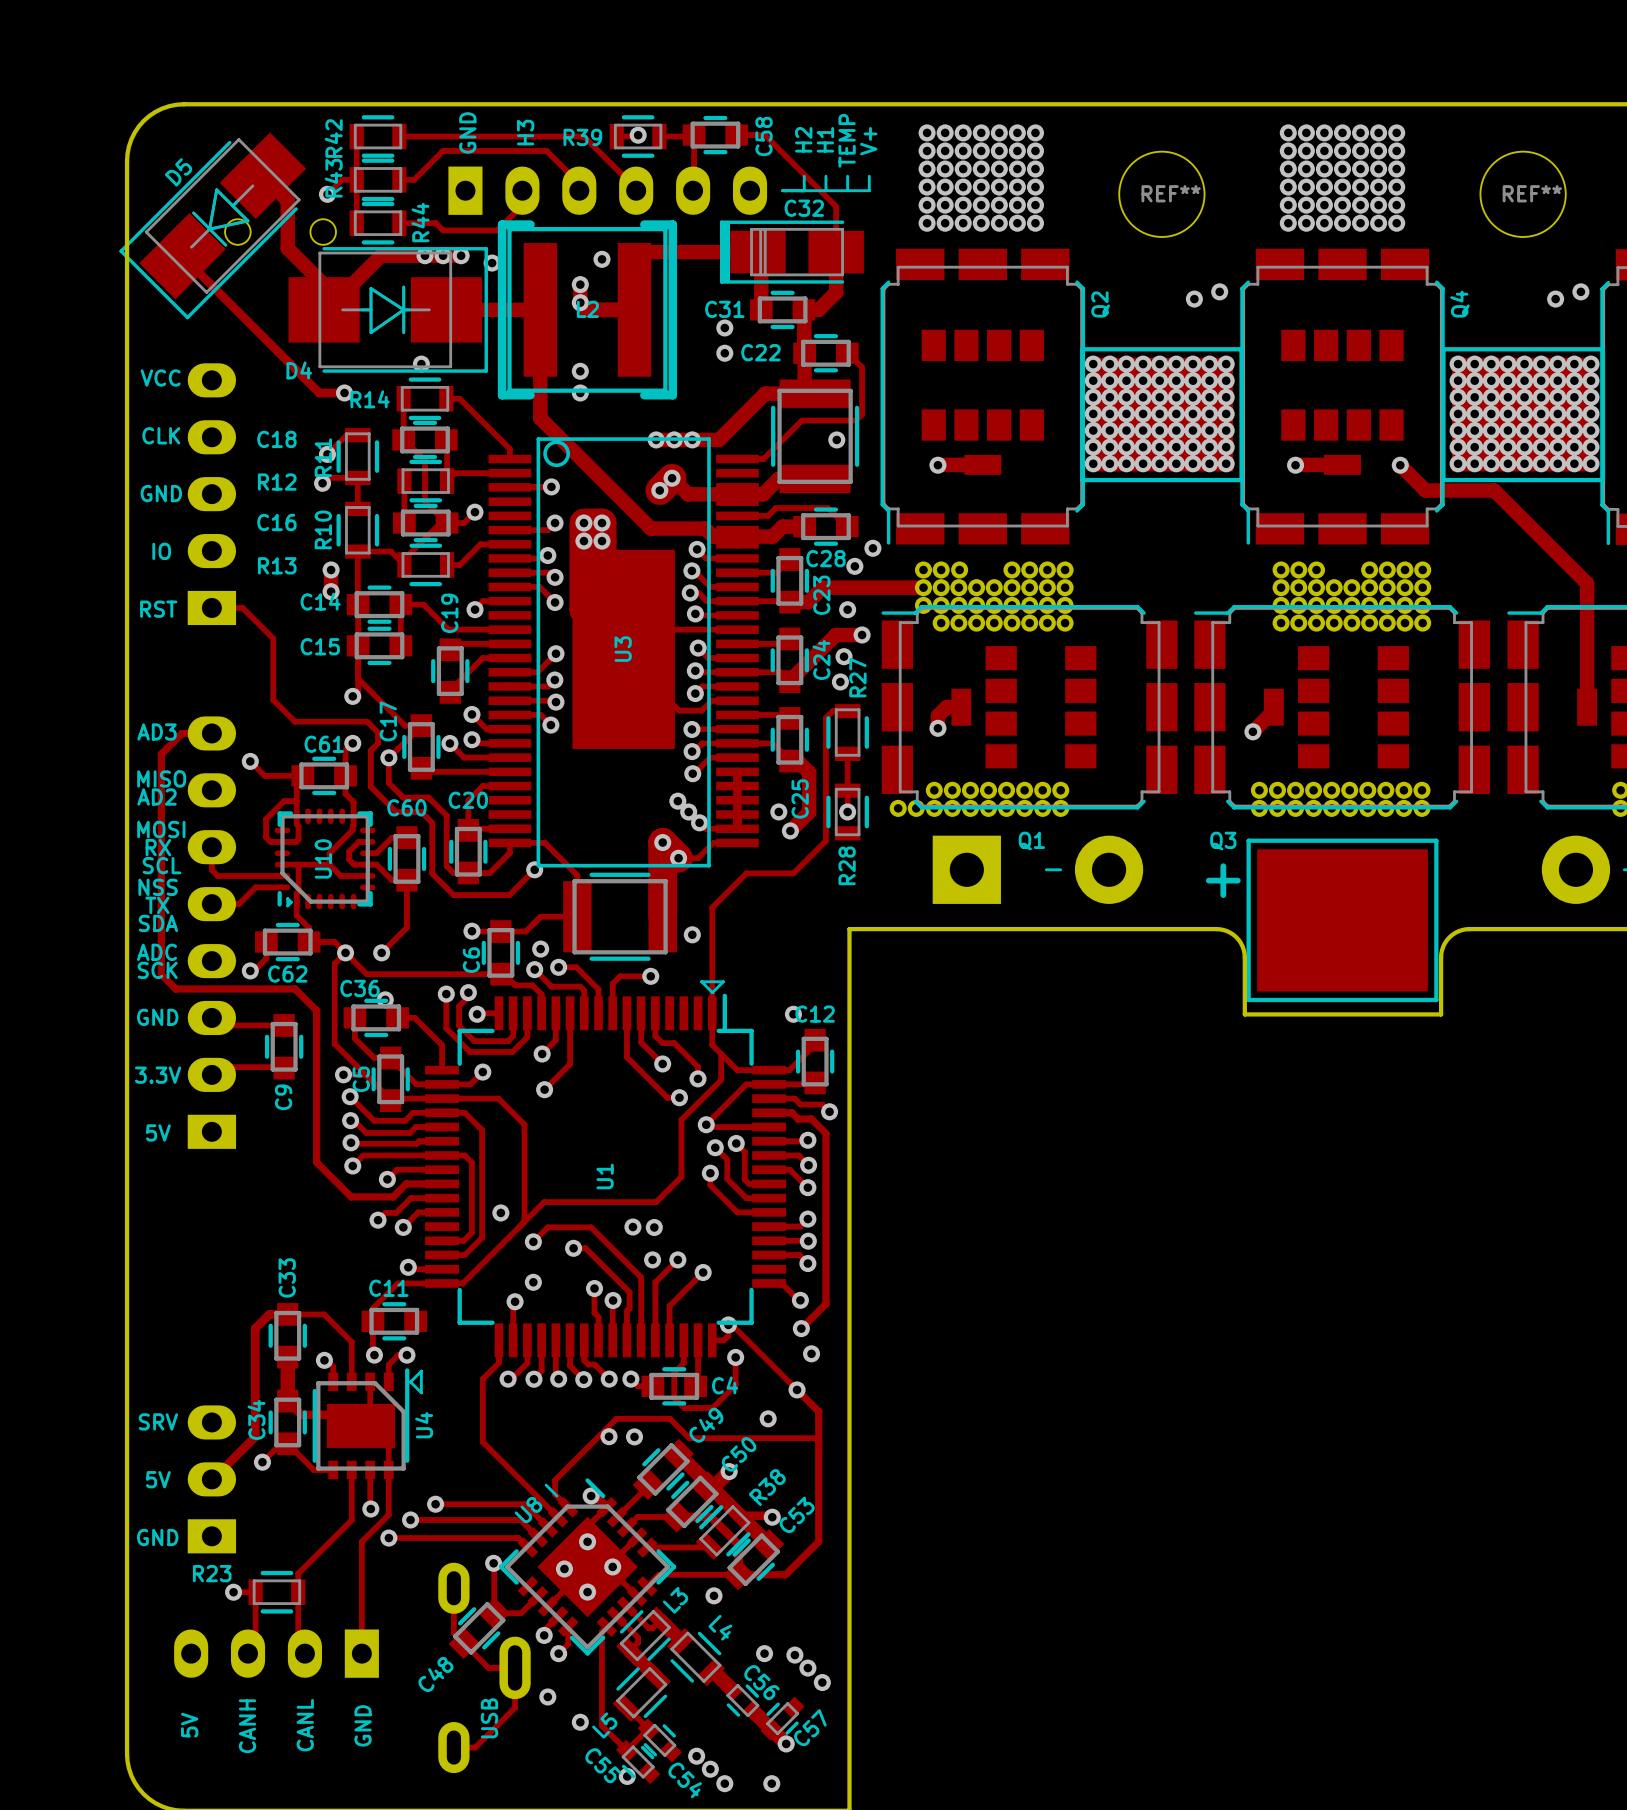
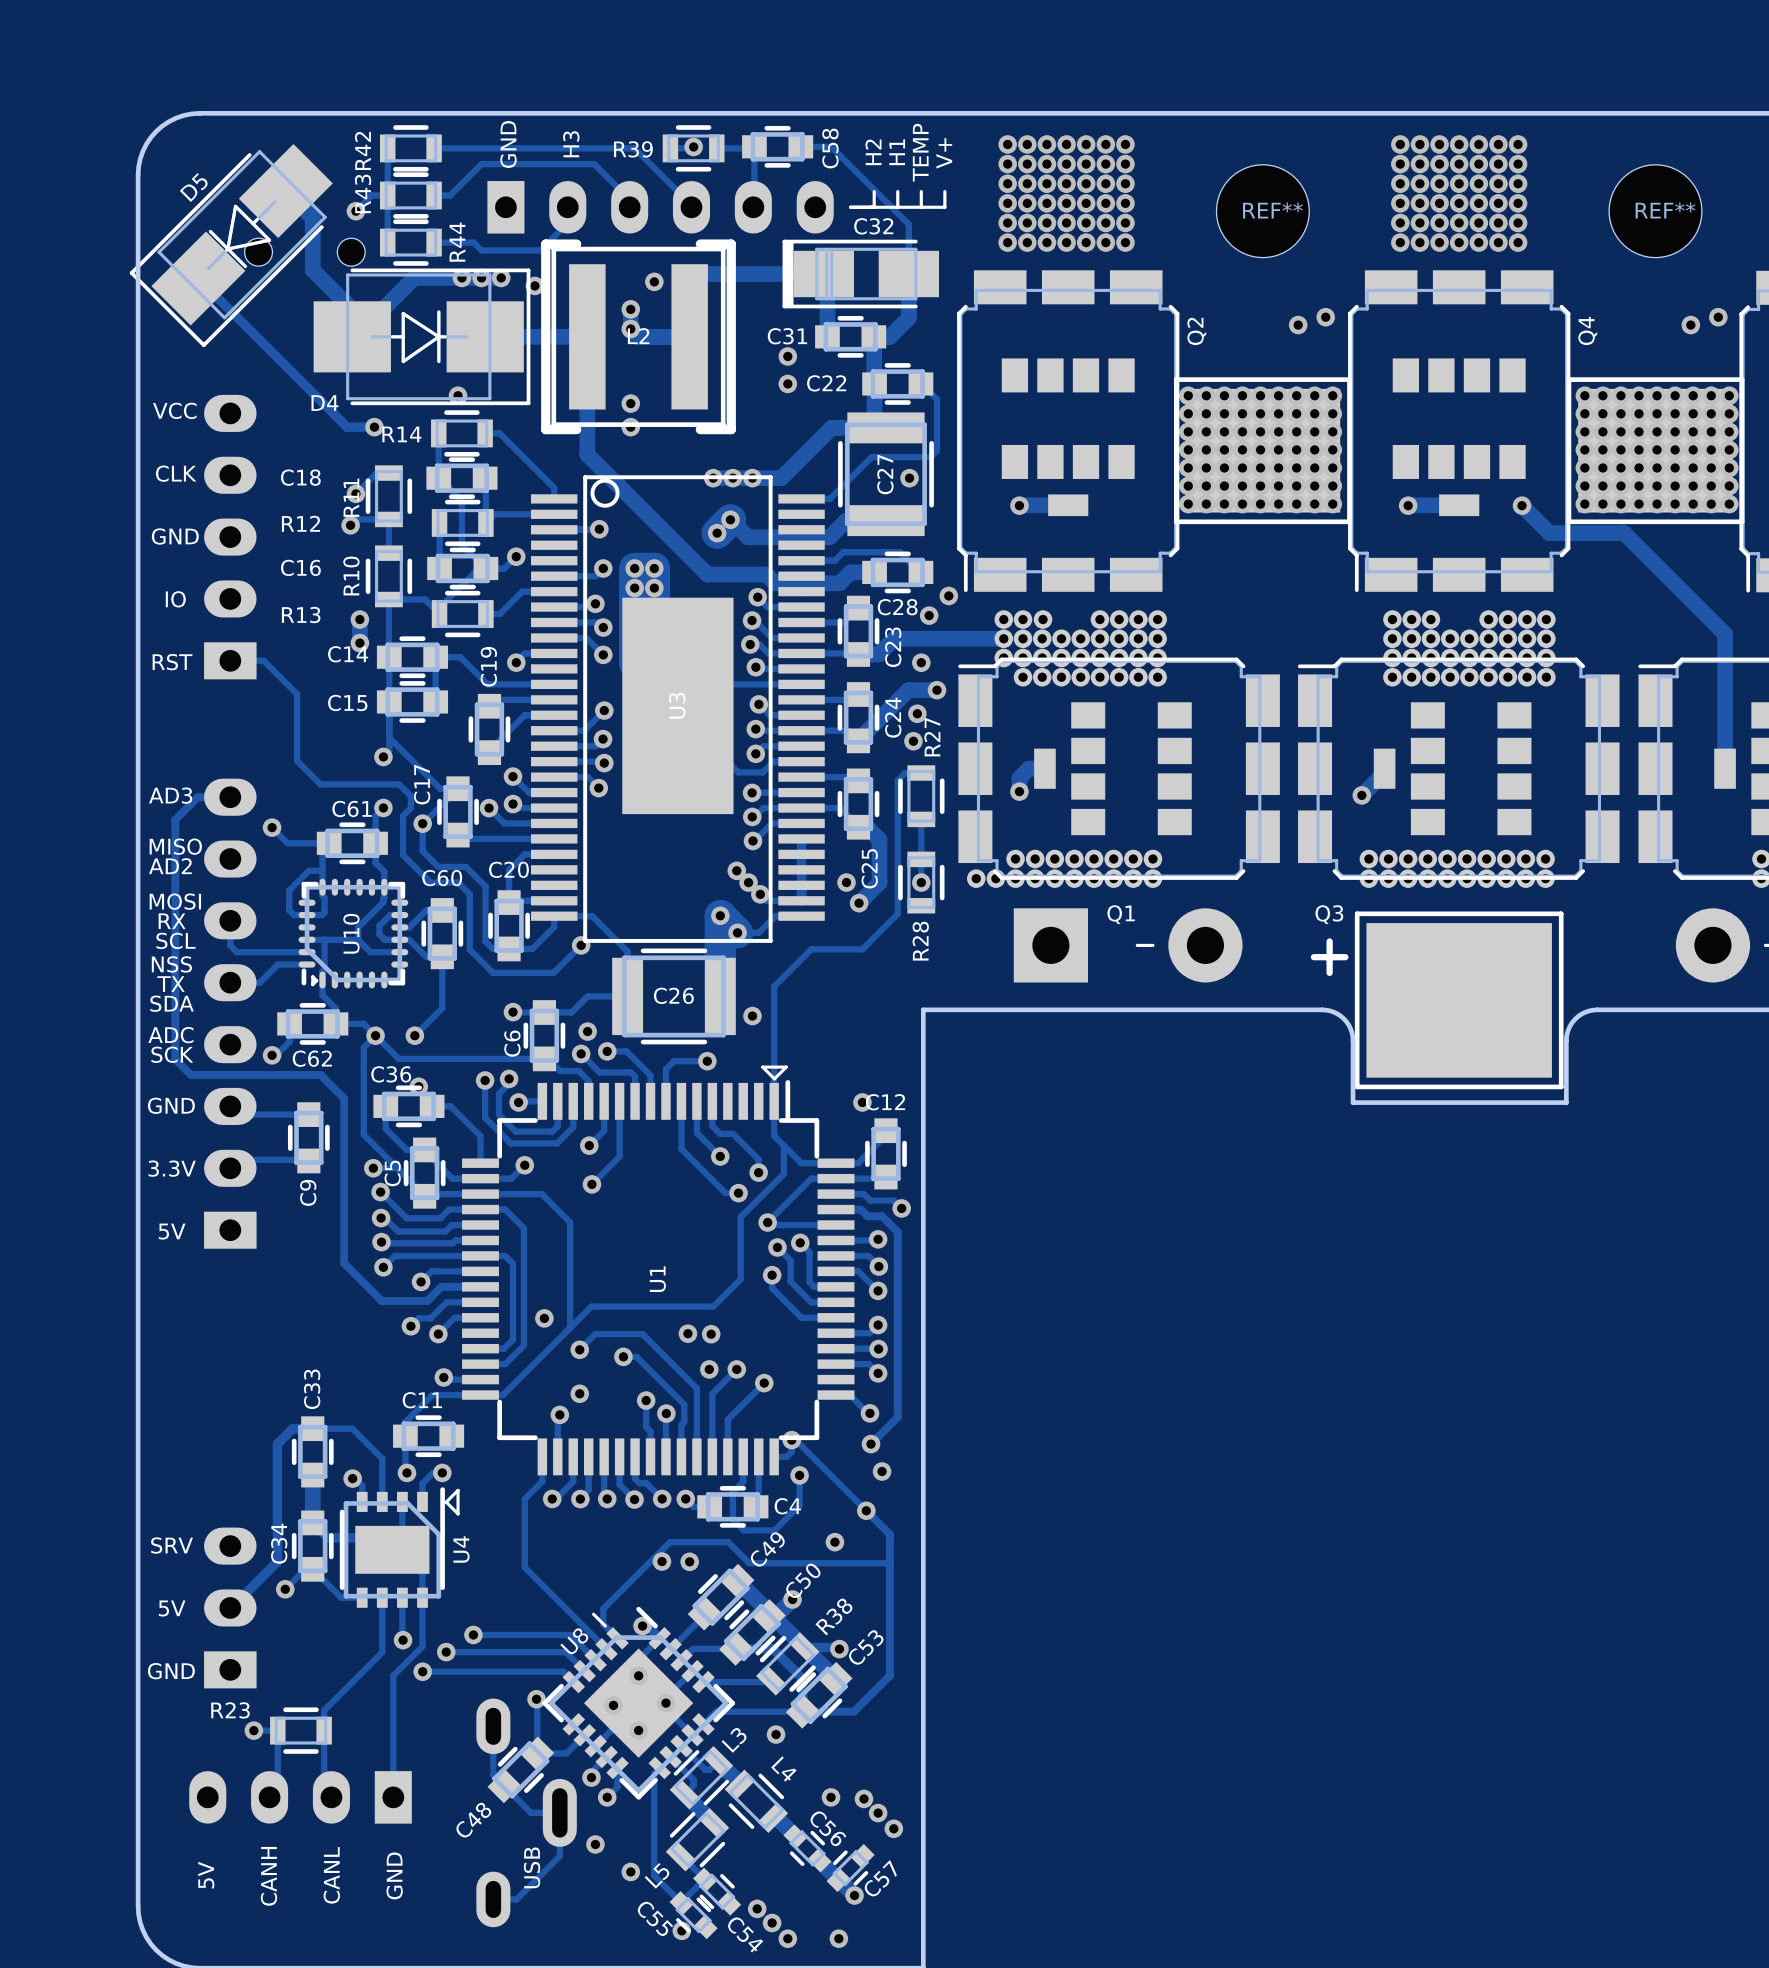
C27 name: none -> C27 (885, 474)
C26 name: none -> C26 (673, 995)

